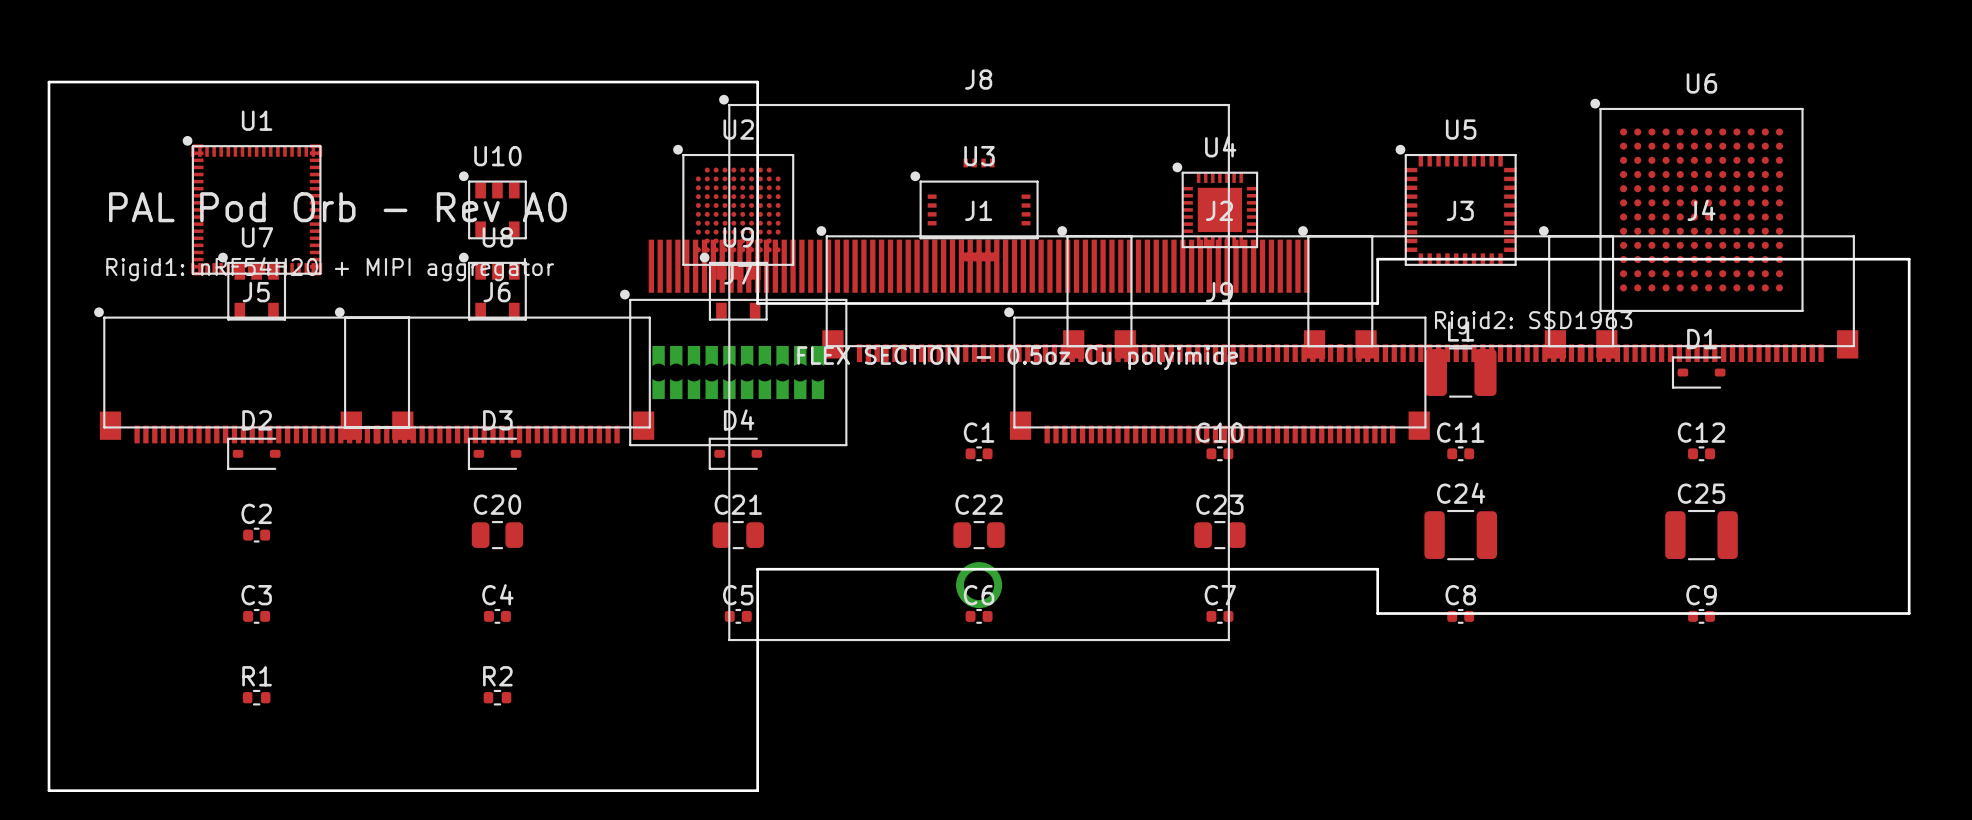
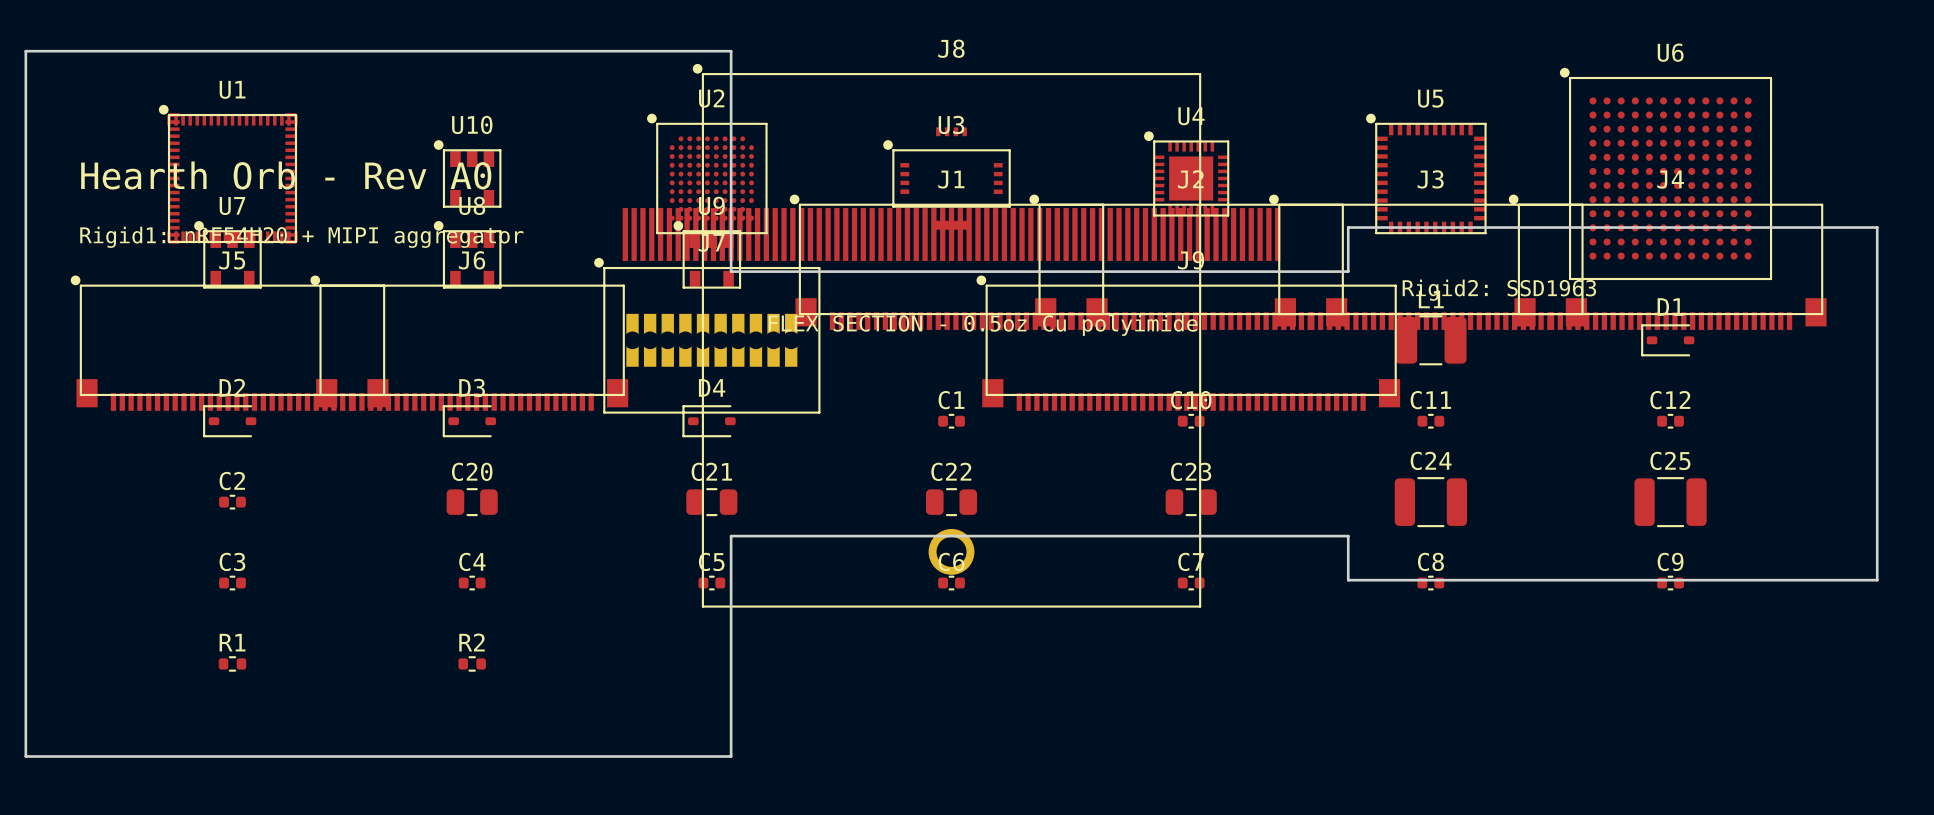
text: PAL Pod Orb - Rev A0 (337, 207) -> Hearth Orb - Rev A0 (286, 175)

